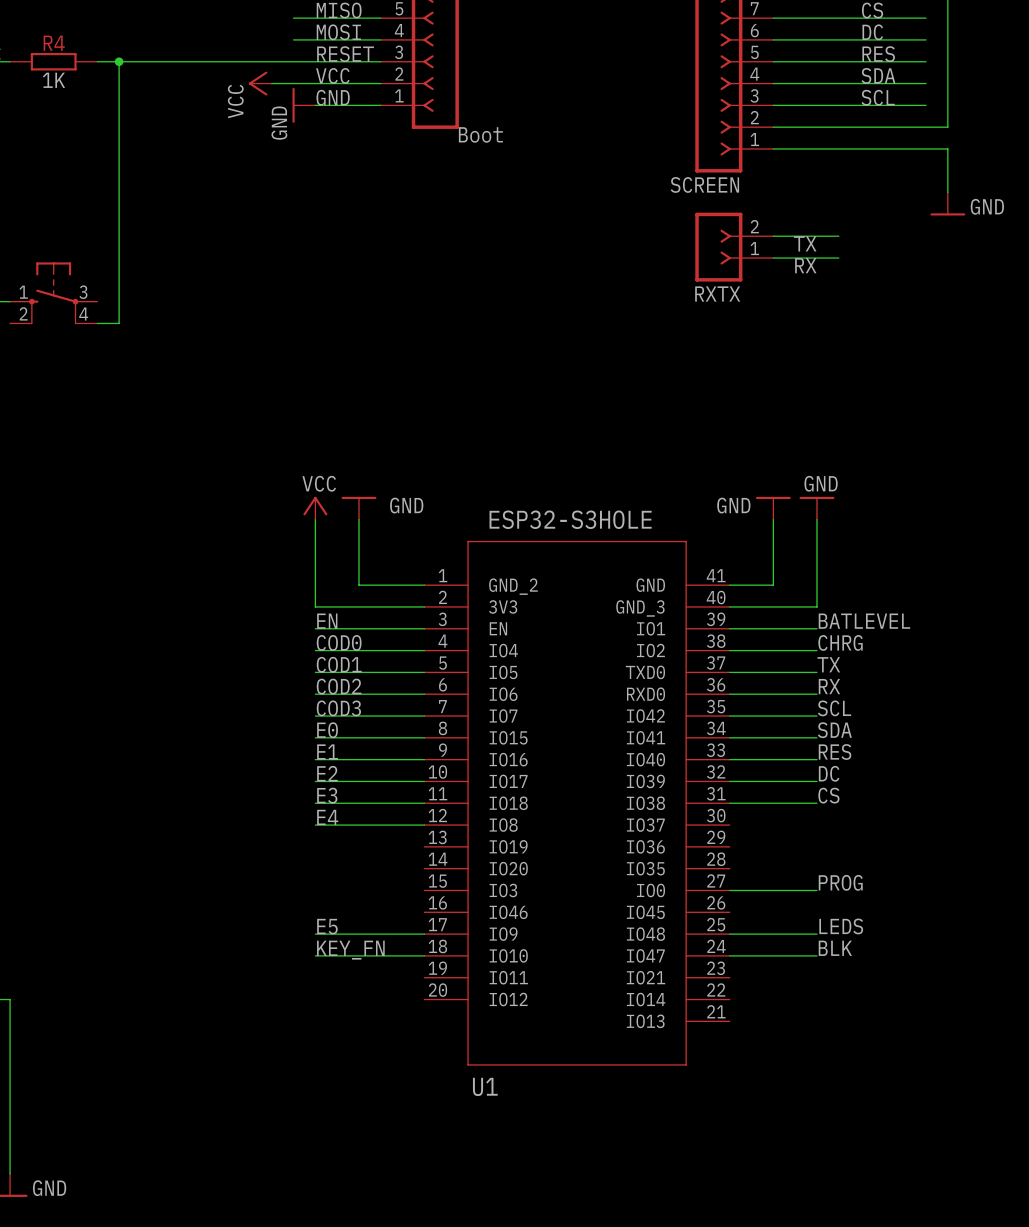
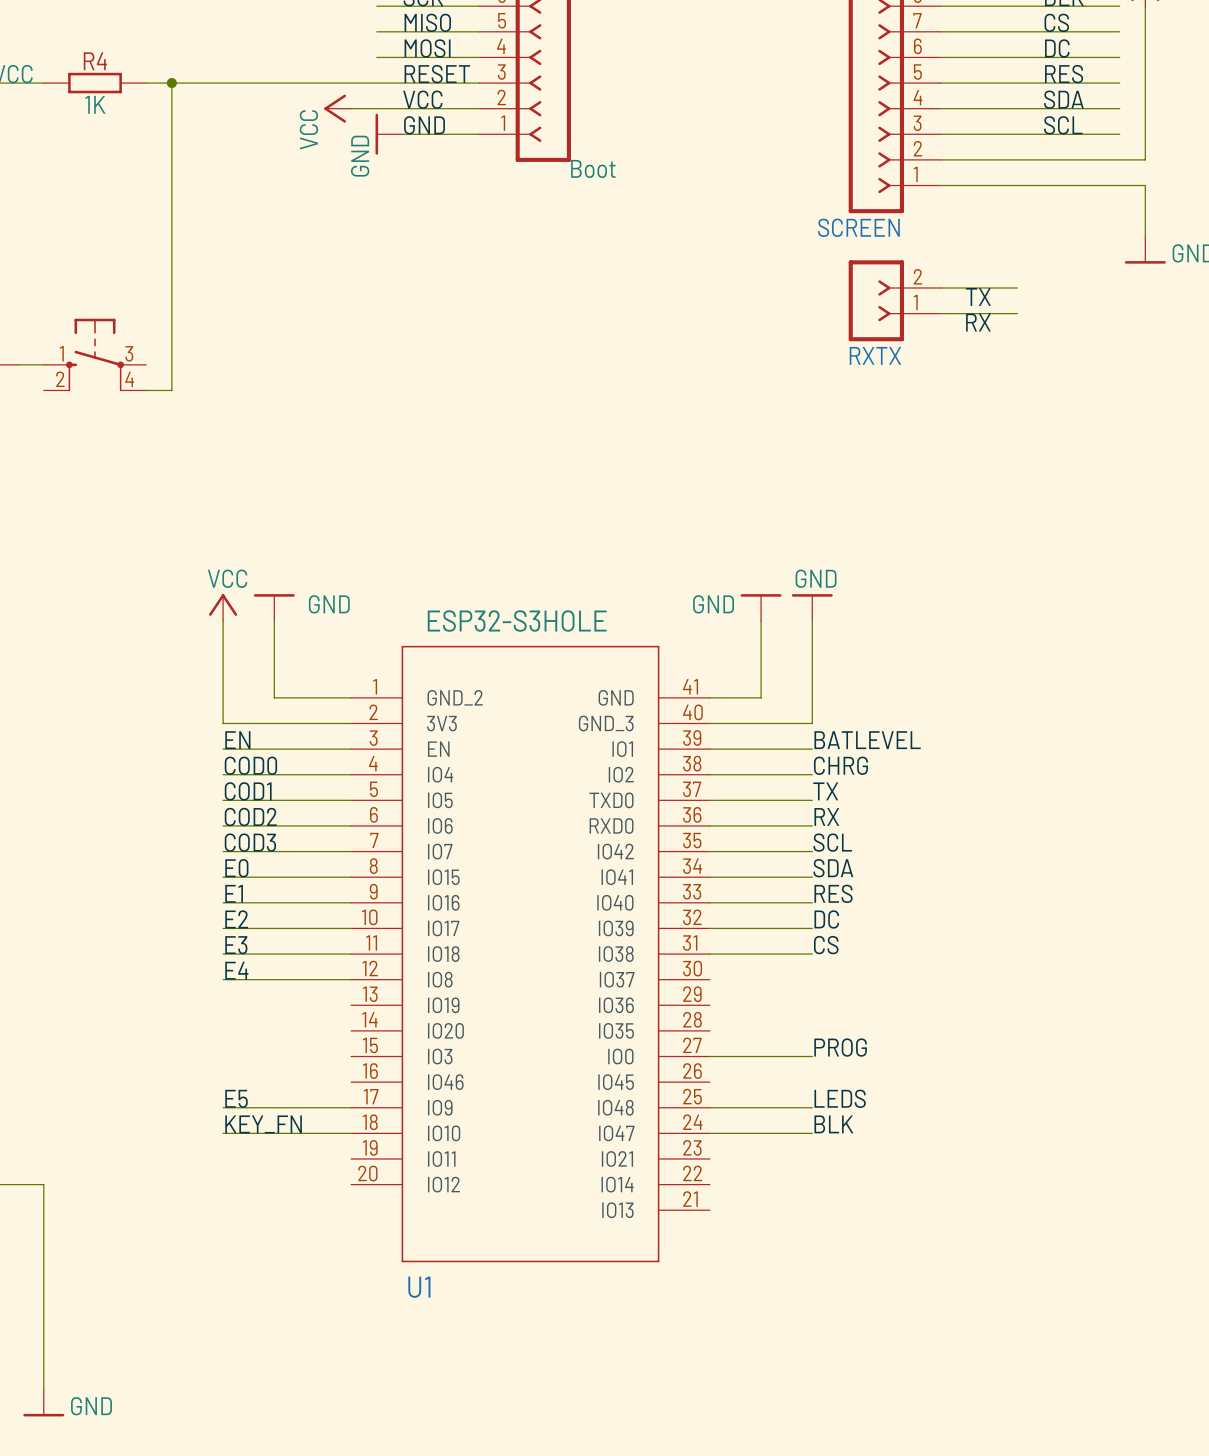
power symbol: none -> GND (274, 607)
power symbol position: VCC (315, 508) -> VCC (223, 607)
power symbol: GND (359, 508) -> none
power symbol: none -> GND (761, 607)
power symbol: none -> GND (812, 607)
power symbol: GND (773, 508) -> none
power symbol: GND (816, 508) -> none
wire: (315, 519) (315, 606) (424, 606) -> (223, 621) (223, 723) (351, 723)
wire: (359, 519) (359, 585) (424, 585) -> (274, 621) (274, 697) (351, 697)
wire: (773, 519) (773, 585) (729, 585) -> (761, 621) (761, 697) (709, 697)
wire: (816, 519) (816, 606) (729, 606) -> (812, 621) (812, 723) (709, 723)
label position: EN (327, 621) -> EN (237, 740)
label position: BATLEVEL (864, 621) -> BATLEVEL (867, 740)
wire: (315, 628) (424, 628) -> (223, 749) (351, 749)
wire: (729, 628) (816, 628) -> (709, 749) (812, 749)
label position: COD0 (339, 642) -> COD0 (250, 765)
label position: CHRG (840, 642) -> CHRG (840, 765)
wire: (315, 650) (424, 650) -> (223, 774) (351, 774)
wire: (729, 650) (816, 650) -> (709, 774) (812, 774)
label position: COD1 (339, 664) -> COD1 (248, 791)
label position: TX (828, 664) -> TX (825, 791)
wire: (315, 672) (424, 672) -> (223, 800) (351, 800)
wire: (729, 672) (816, 672) -> (709, 800) (812, 800)
label position: COD2 (339, 686) -> COD2 (250, 817)
label position: RX (829, 686) -> RX (826, 816)
wire: (315, 694) (424, 694) -> (223, 825) (351, 825)
wire: (729, 694) (816, 694) -> (709, 825) (812, 825)
label position: COD3 (338, 708) -> COD3 (250, 842)
label position: SCL (834, 708) -> SCL (832, 842)
wire: (315, 716) (424, 716) -> (223, 851) (351, 851)
wire: (729, 716) (816, 716) -> (709, 851) (812, 851)
label position: E0 (327, 730) -> E0 (236, 868)
label position: SDA (834, 730) -> SDA (833, 868)
wire: (315, 737) (424, 737) -> (223, 877) (351, 877)
wire: (729, 737) (816, 737) -> (709, 877) (812, 877)
label position: E1 (327, 752) -> E1 (234, 893)
label position: RES (835, 752) -> RES (833, 893)
wire: (315, 759) (424, 759) -> (223, 902) (351, 902)
wire: (729, 759) (816, 759) -> (709, 902) (812, 902)
label position: E2 (327, 773) -> E2 (236, 919)
label position: DC (829, 773) -> DC (826, 919)
wire: (315, 781) (424, 781) -> (223, 928) (351, 928)
wire: (729, 781) (816, 781) -> (709, 928) (812, 928)
label position: E3 (327, 795) -> E3 (236, 945)
label position: CS (828, 795) -> CS (826, 945)
wire: (315, 803) (424, 803) -> (223, 954) (351, 954)
U1 position: (577, 803) -> (530, 954)
wire: (729, 803) (816, 803) -> (709, 954) (812, 954)
label position: E4 (327, 817) -> E4 (236, 970)
wire: (315, 825) (424, 825) -> (223, 979) (351, 979)
label position: PROG (840, 882) -> PROG (840, 1047)
wire: (729, 890) (816, 890) -> (709, 1056) (812, 1056)
label position: E5 (327, 926) -> E5 (236, 1098)
label position: LEDS (841, 926) -> LEDS (840, 1098)
wire: (315, 934) (424, 934) -> (223, 1107) (351, 1107)
wire: (729, 934) (816, 934) -> (709, 1107) (812, 1107)
label position: BLK (835, 948) -> BLK (833, 1124)
label position: KEY_FN (350, 950) -> KEY_FN (263, 1124)
wire: (315, 955) (424, 955) -> (223, 1133) (351, 1133)
wire: (729, 955) (816, 955) -> (709, 1133) (812, 1133)

